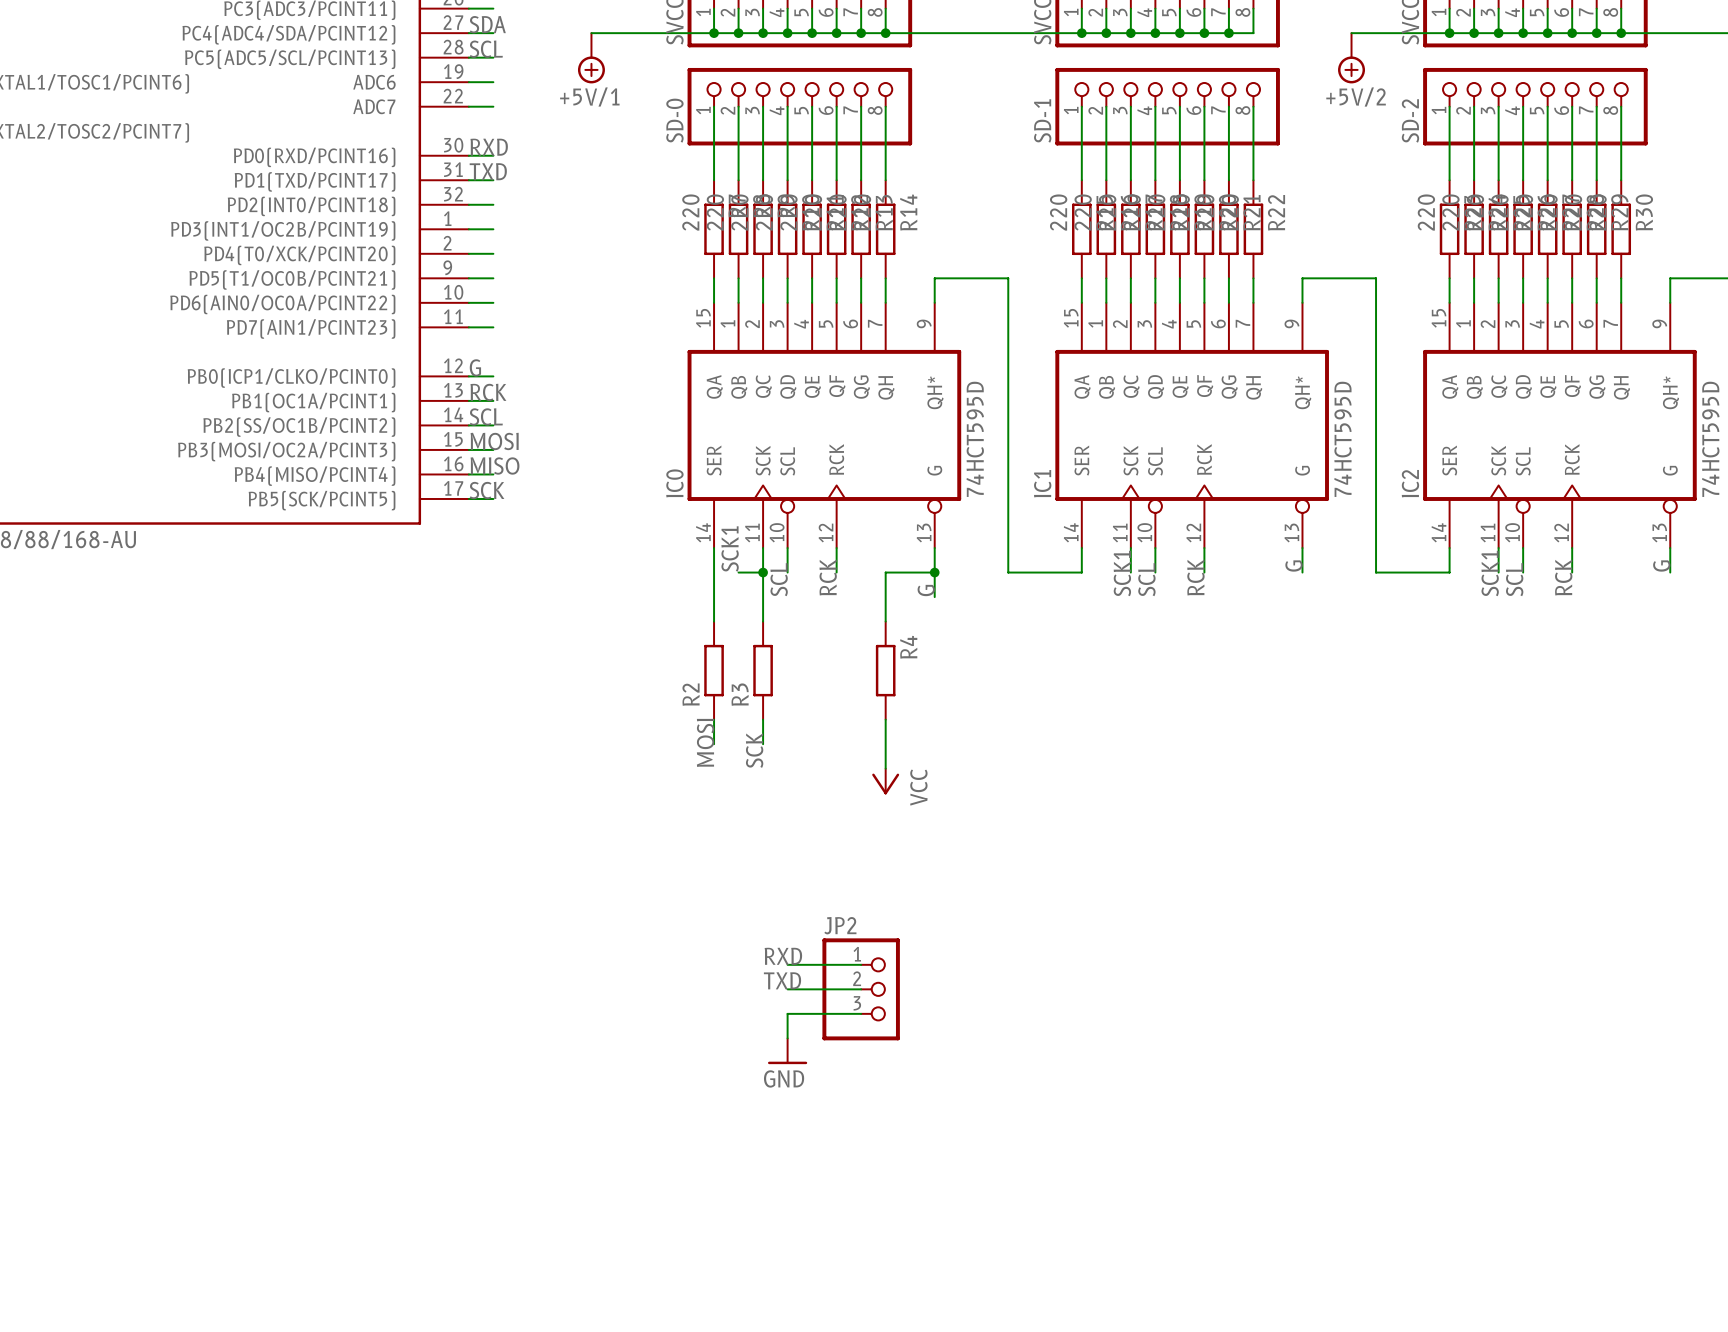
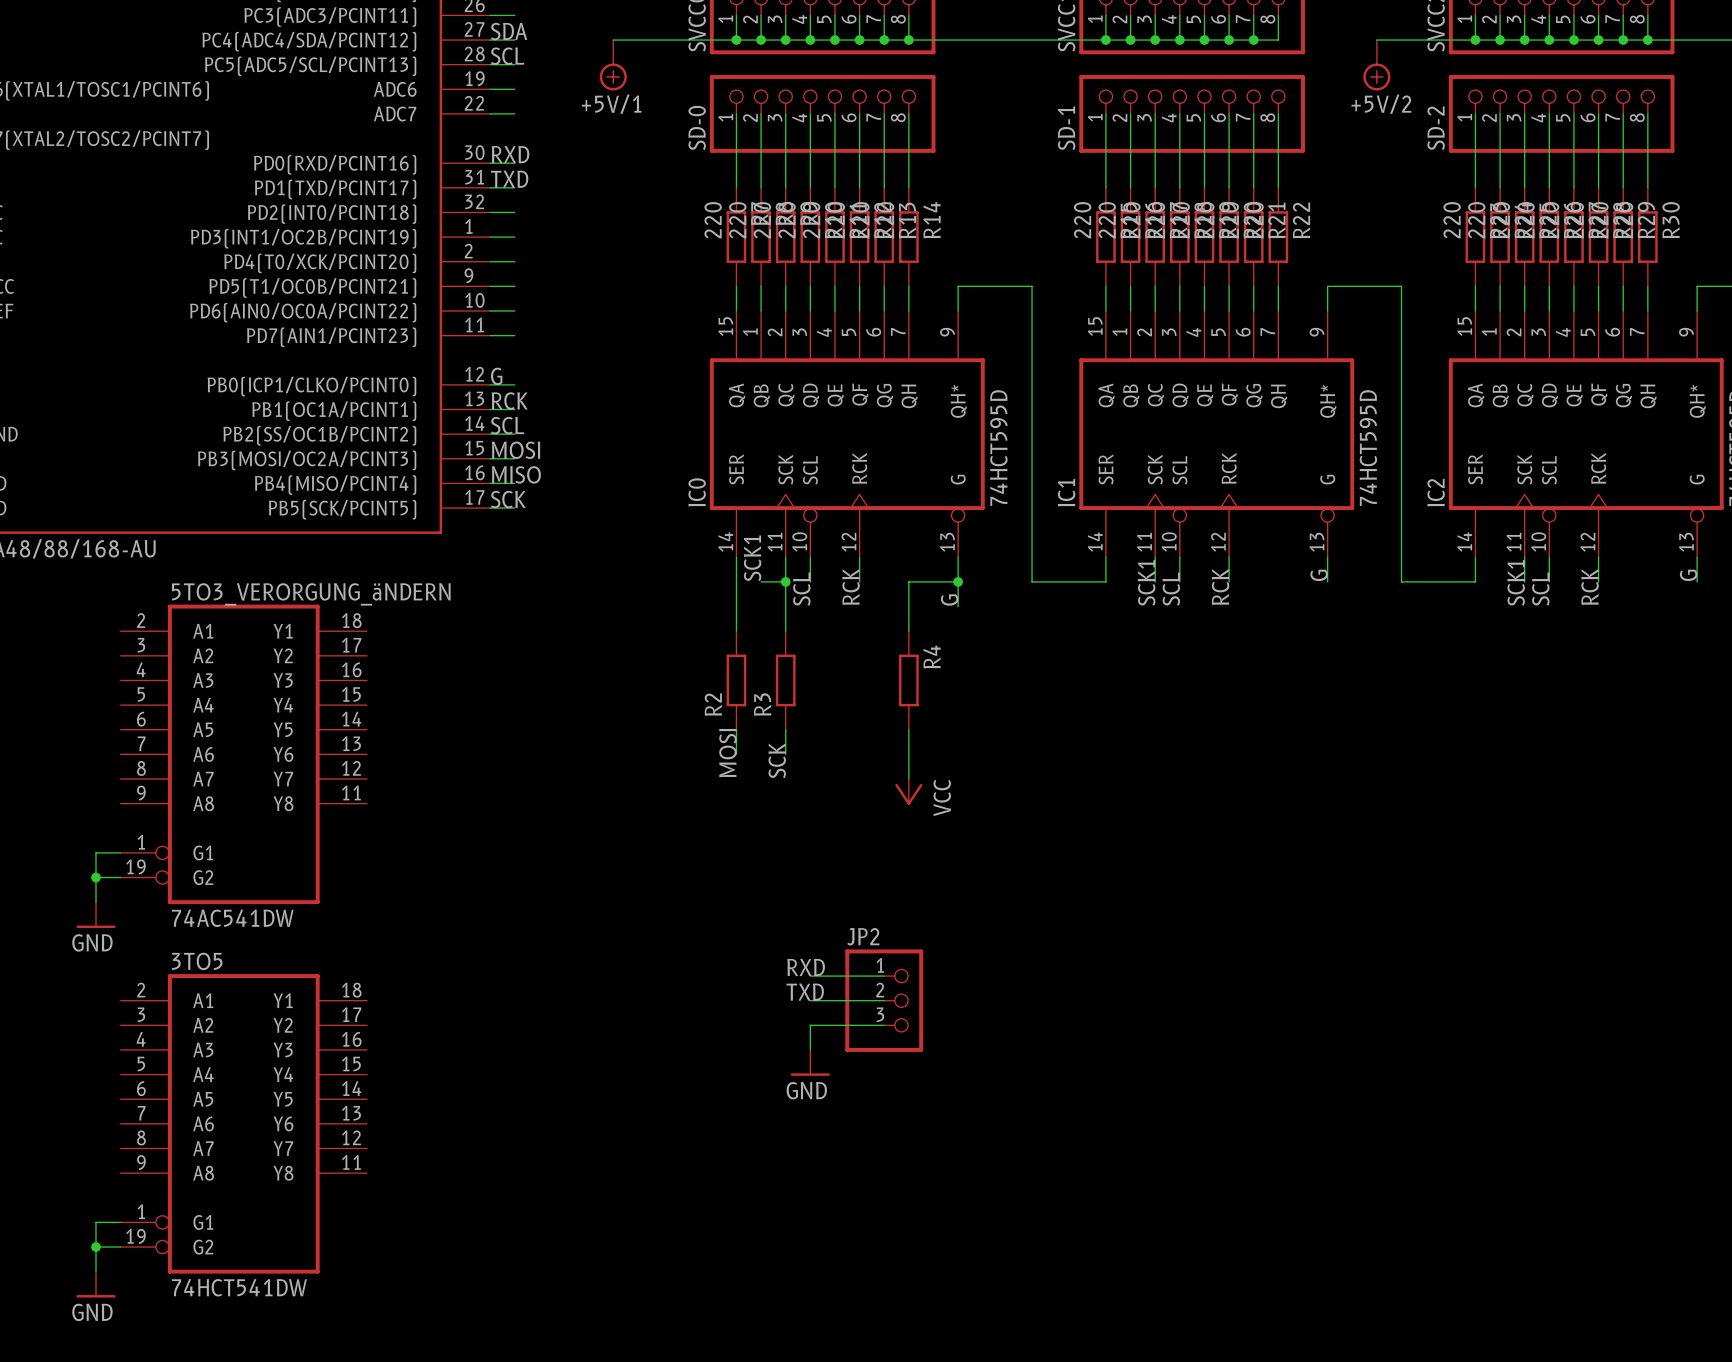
5TO3_VERORGUNG_äNDERN: none -> 74AC541DW (243, 754)
wire: none -> (120, 852) (96, 852) (96, 902)
wire: none -> (96, 877) (120, 877)
junction: none -> (96, 877)
power symbol: none -> GND (96, 915)
3TO5: none -> 74HCT541DW (243, 1123)
wire: none -> (120, 1222) (96, 1222) (96, 1271)
wire: none -> (96, 1247) (120, 1247)
junction: none -> (96, 1247)
power symbol: none -> GND (96, 1284)

